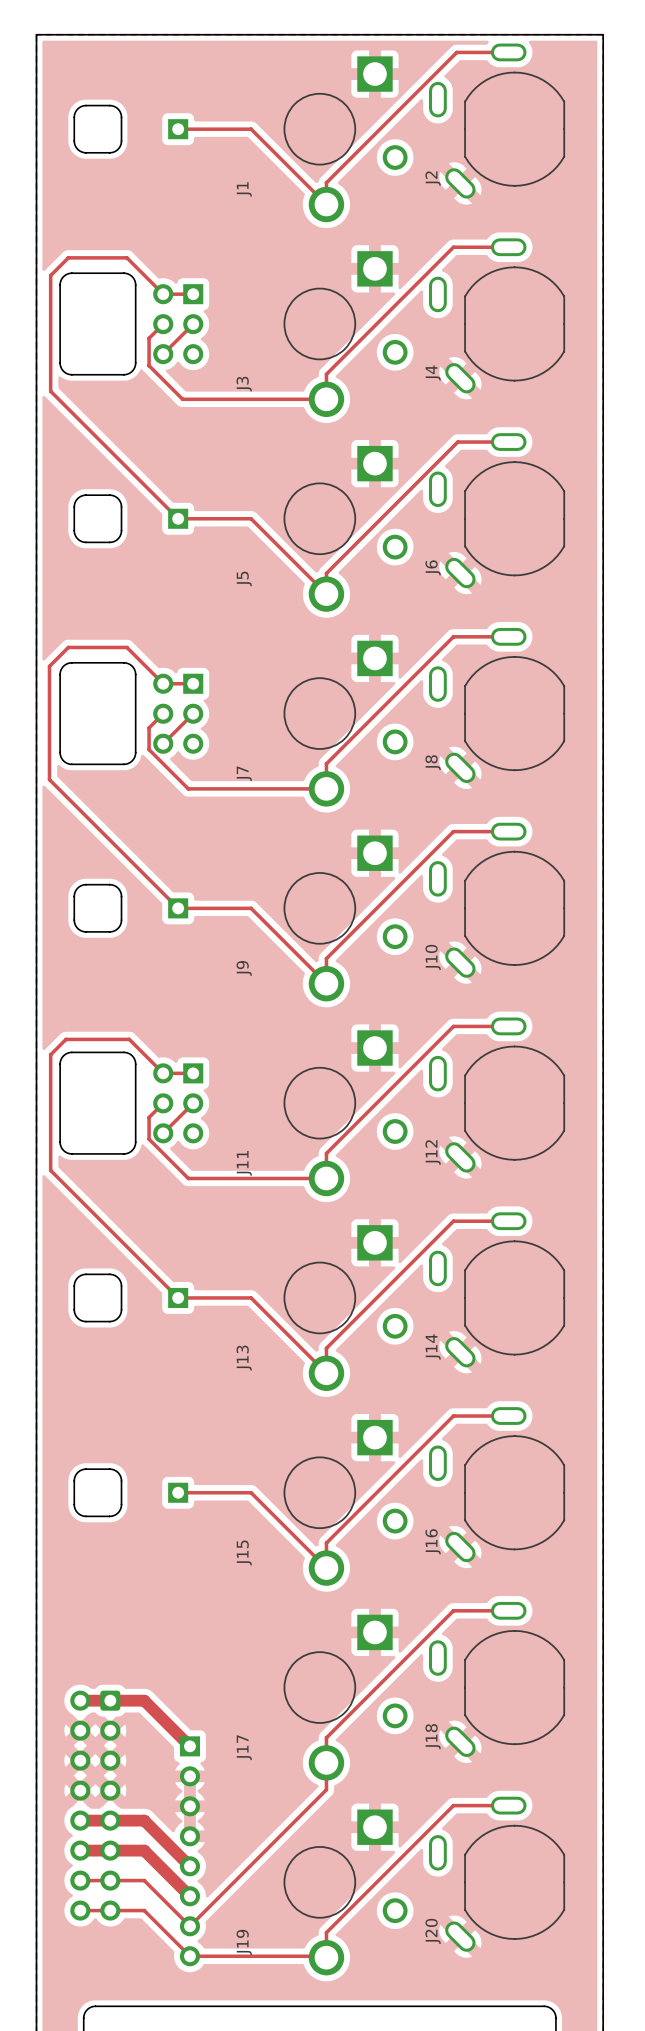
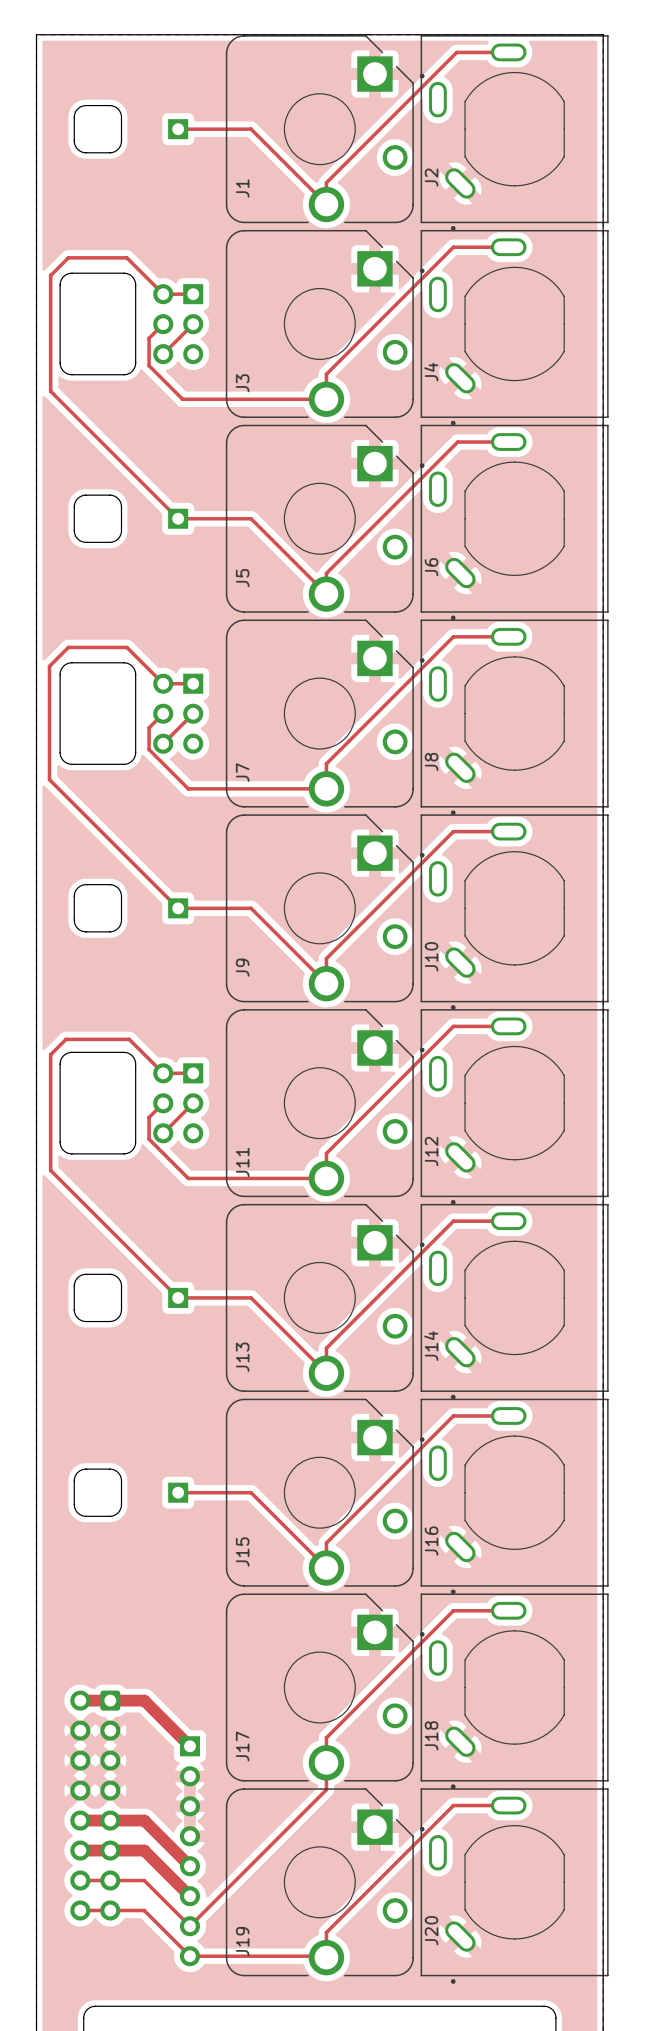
J2 footprint: [429, 43, 566, 199] -> [420, 35, 609, 231]
J1 footprint: [283, 56, 408, 223] -> [225, 35, 425, 224]
J4 footprint: [429, 238, 566, 394] -> [420, 229, 609, 426]
J3 footprint: [283, 251, 408, 418] -> [225, 229, 425, 418]
J6 footprint: [429, 433, 566, 589] -> [420, 424, 609, 621]
J5 footprint: [283, 445, 408, 612] -> [225, 424, 425, 613]
J8 footprint: [429, 627, 566, 784] -> [420, 619, 609, 816]
J7 footprint: [283, 640, 408, 807] -> [225, 619, 425, 808]
J10 footprint: [429, 822, 566, 978] -> [420, 814, 609, 1010]
J9 footprint: [283, 835, 408, 1002] -> [225, 814, 425, 1003]
J12 footprint: [429, 1017, 566, 1173] -> [420, 1009, 609, 1205]
J11 footprint: [283, 1030, 408, 1197] -> [225, 1009, 425, 1198]
J14 footprint: [429, 1212, 566, 1368] -> [420, 1203, 609, 1400]
J13 footprint: [283, 1225, 408, 1391] -> [225, 1203, 425, 1392]
J16 footprint: [429, 1407, 566, 1563] -> [420, 1398, 609, 1595]
J15 footprint: [283, 1419, 408, 1586] -> [225, 1398, 425, 1587]
J18 footprint: [429, 1601, 566, 1758] -> [420, 1593, 609, 1790]
J17 footprint: [283, 1614, 408, 1781] -> [225, 1593, 425, 1782]
J20 footprint: [429, 1796, 566, 1952] -> [420, 1788, 609, 1984]
J19 footprint: [283, 1809, 408, 1976] -> [225, 1788, 425, 1977]

